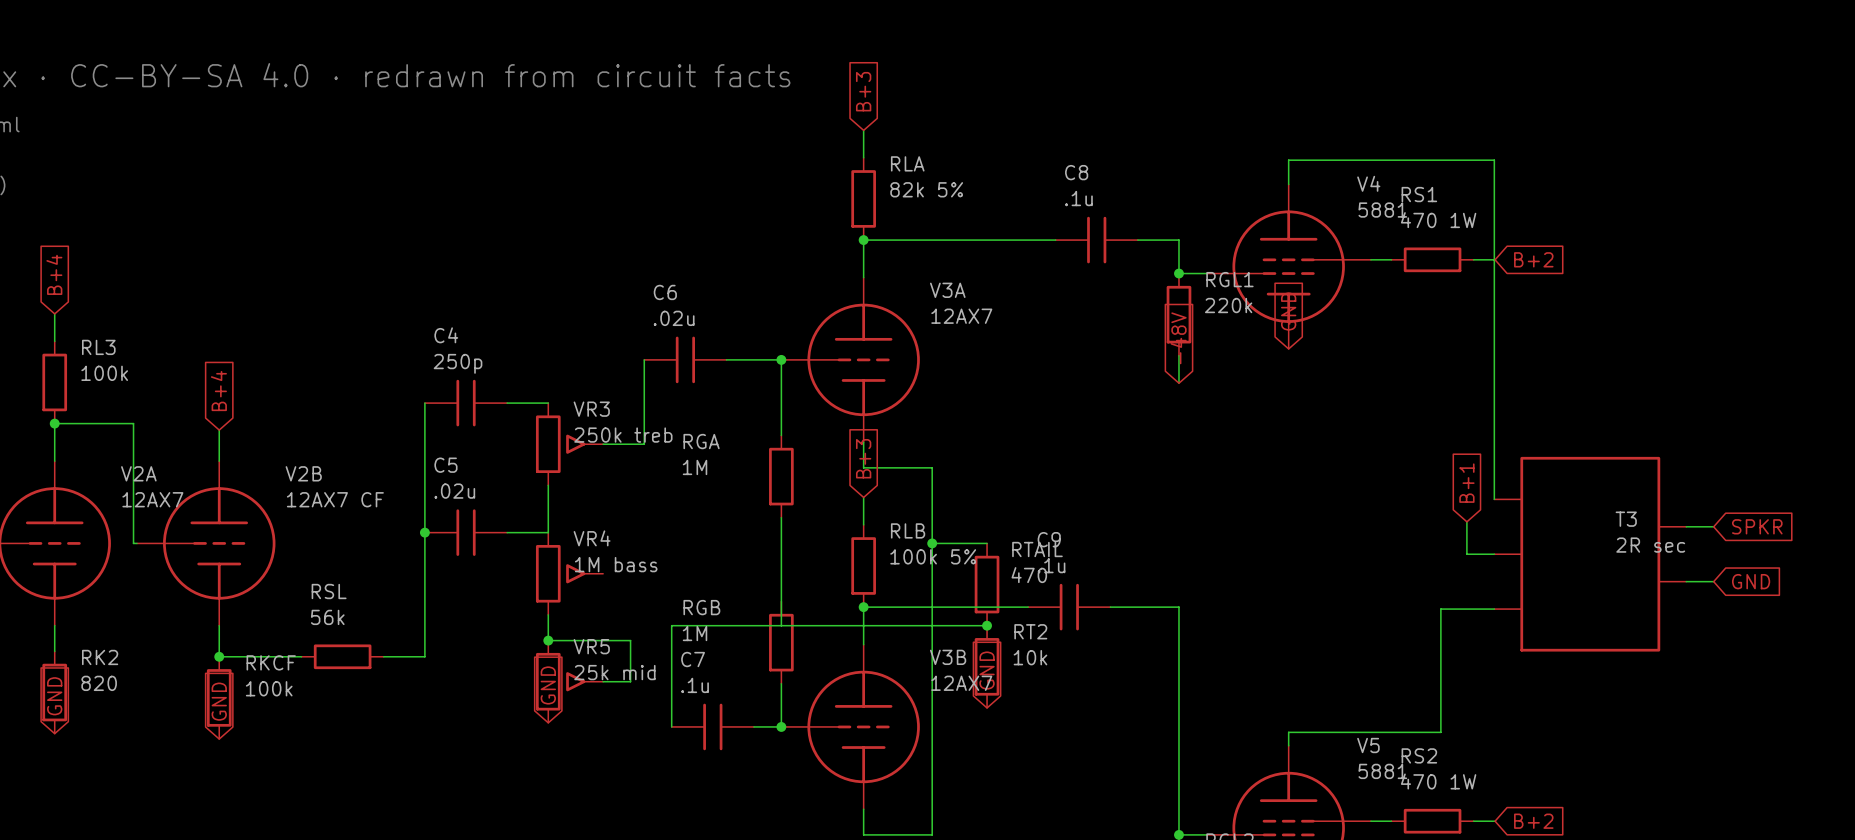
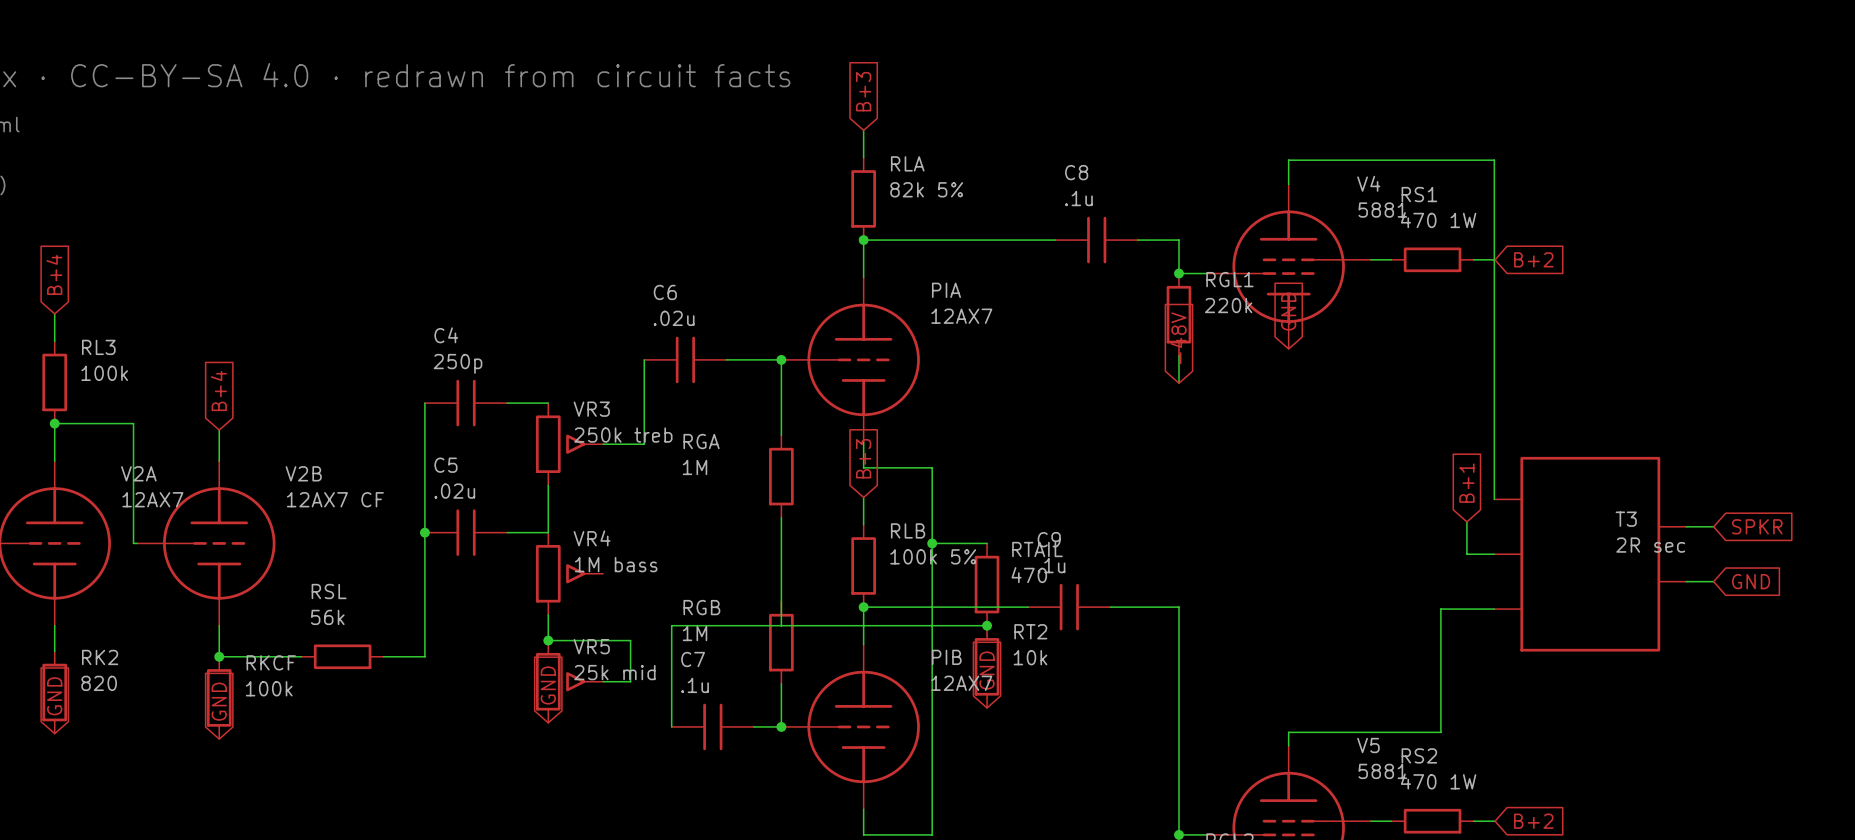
V3A name: V3A (947, 290) -> PIA (946, 290)
V3B name: V3B (948, 657) -> PIB (946, 657)

